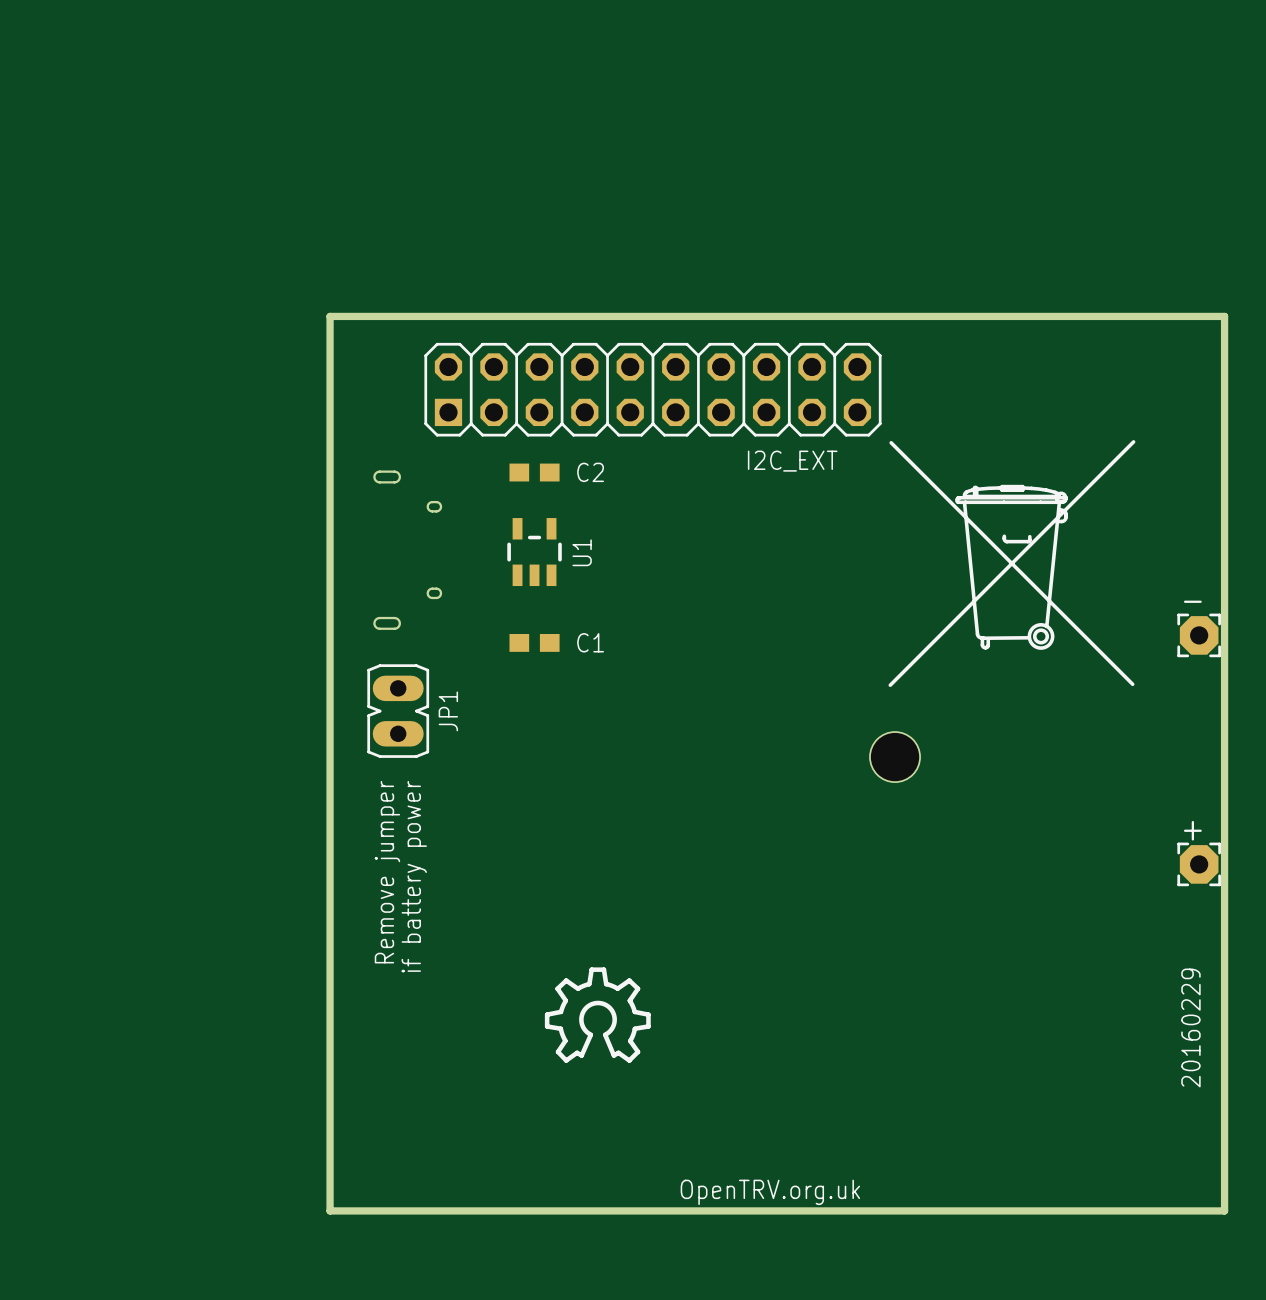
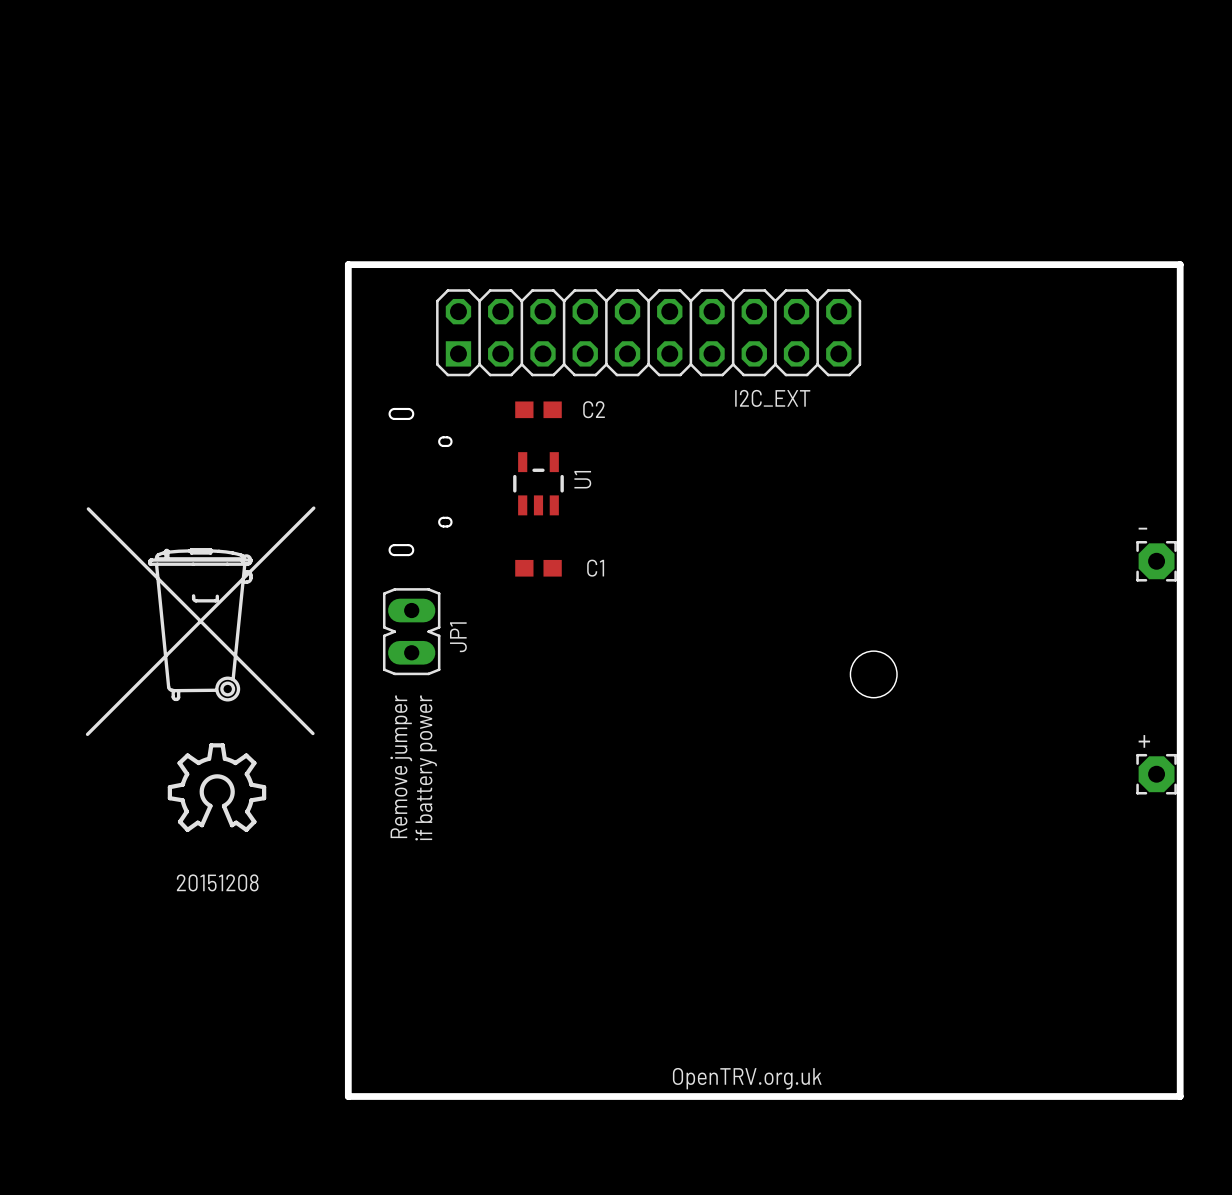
drawing: [888, 440, 1136, 687] -> none
drawing: none -> [85, 506, 316, 737]
text: none -> 20151208 (217, 882)
drawing position: (597, 1015) -> (216, 787)
text: 20160229 (1190, 1027) -> none

